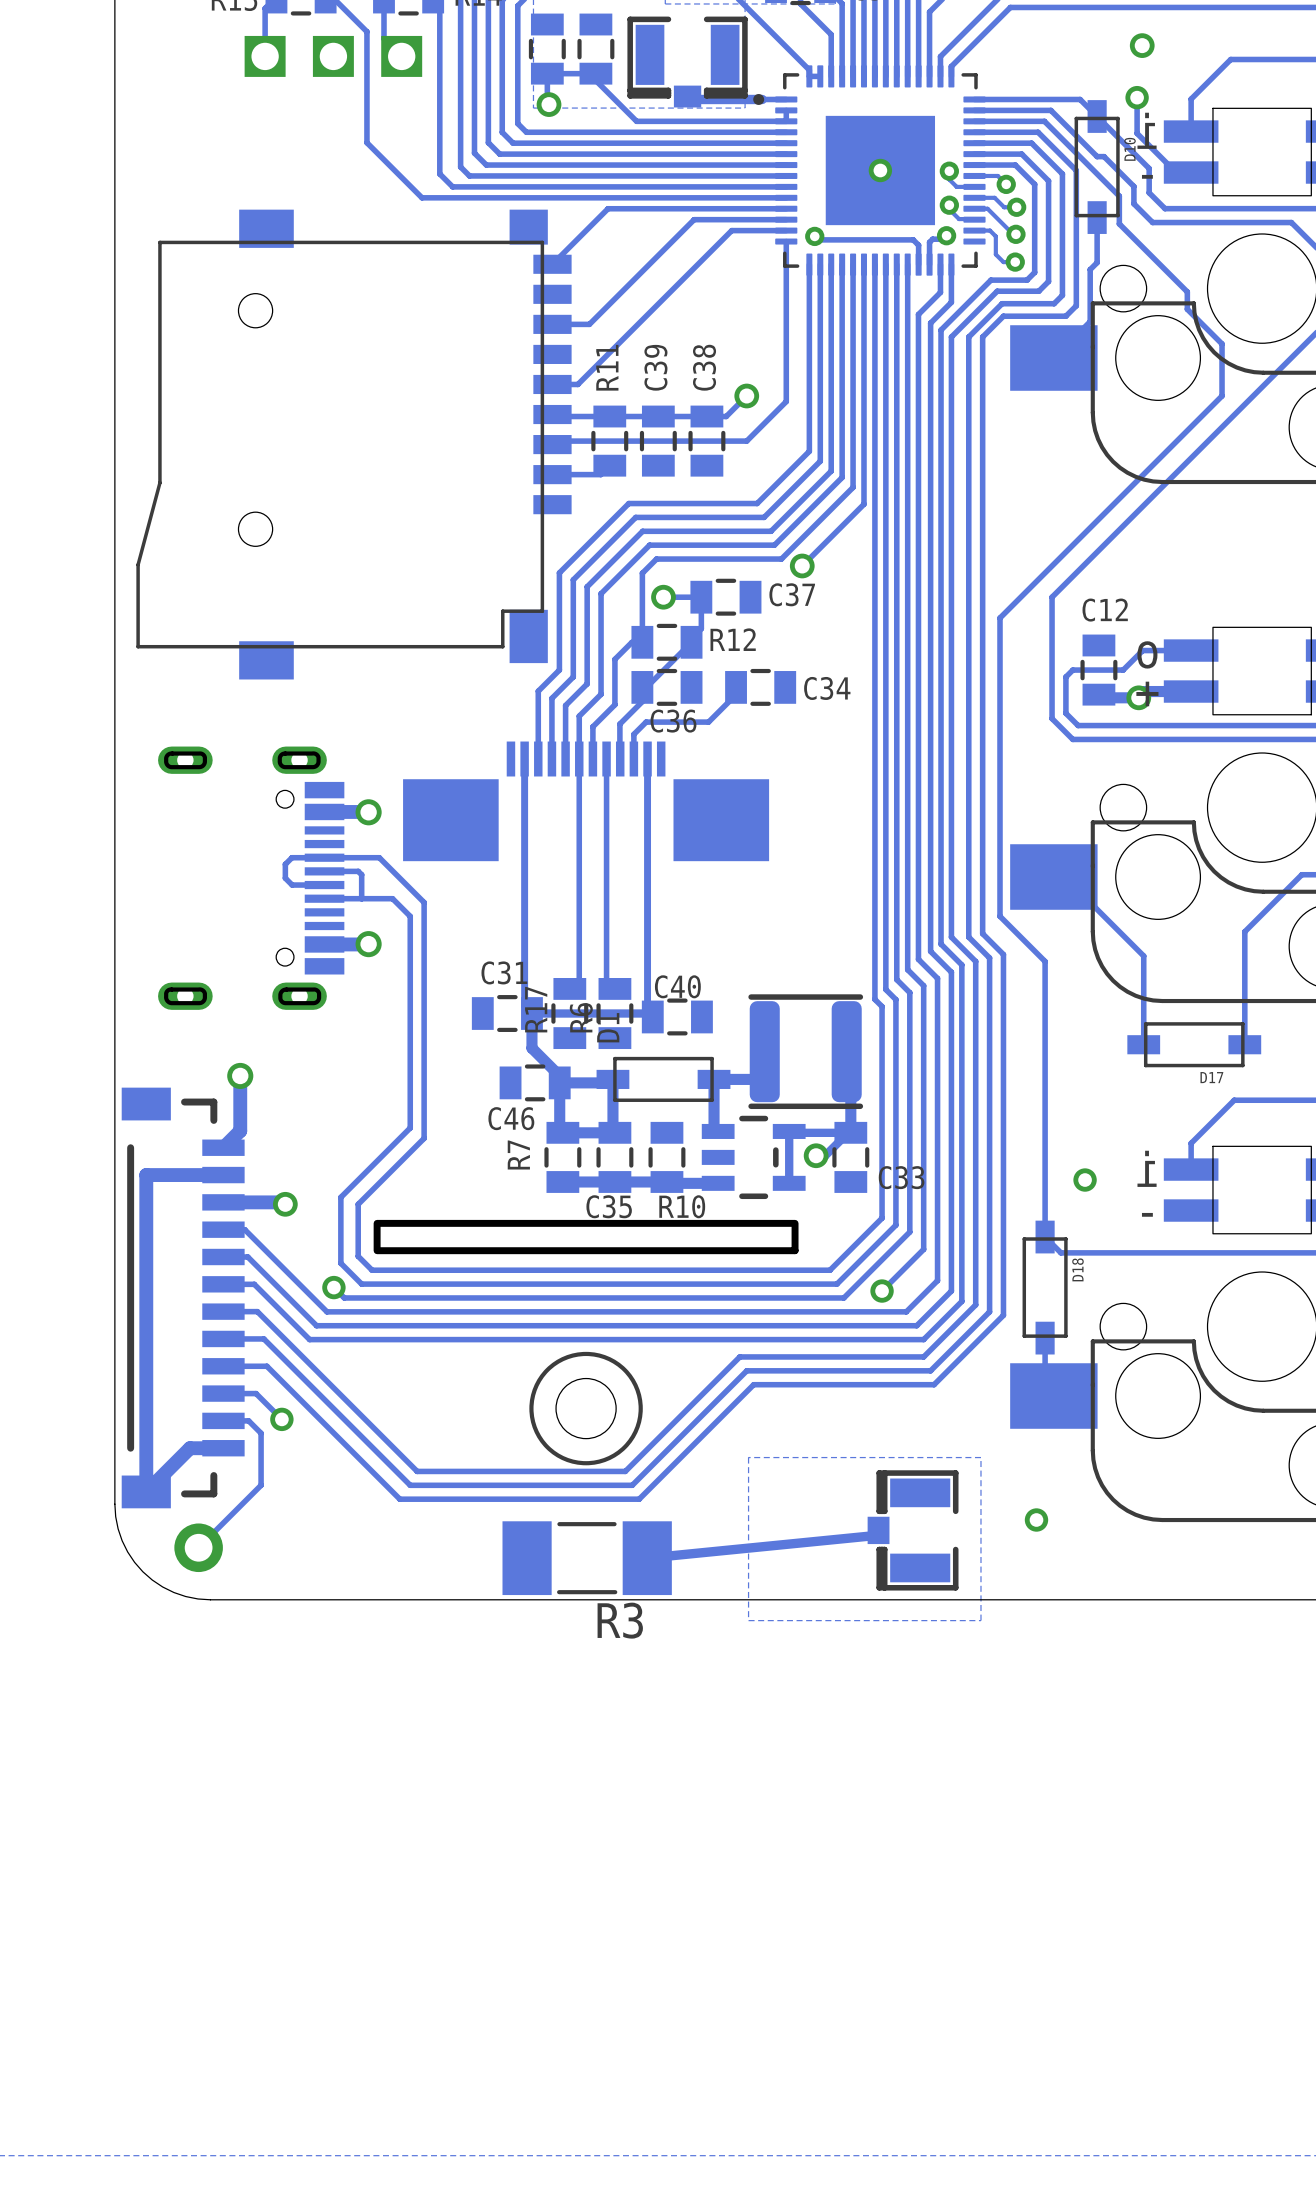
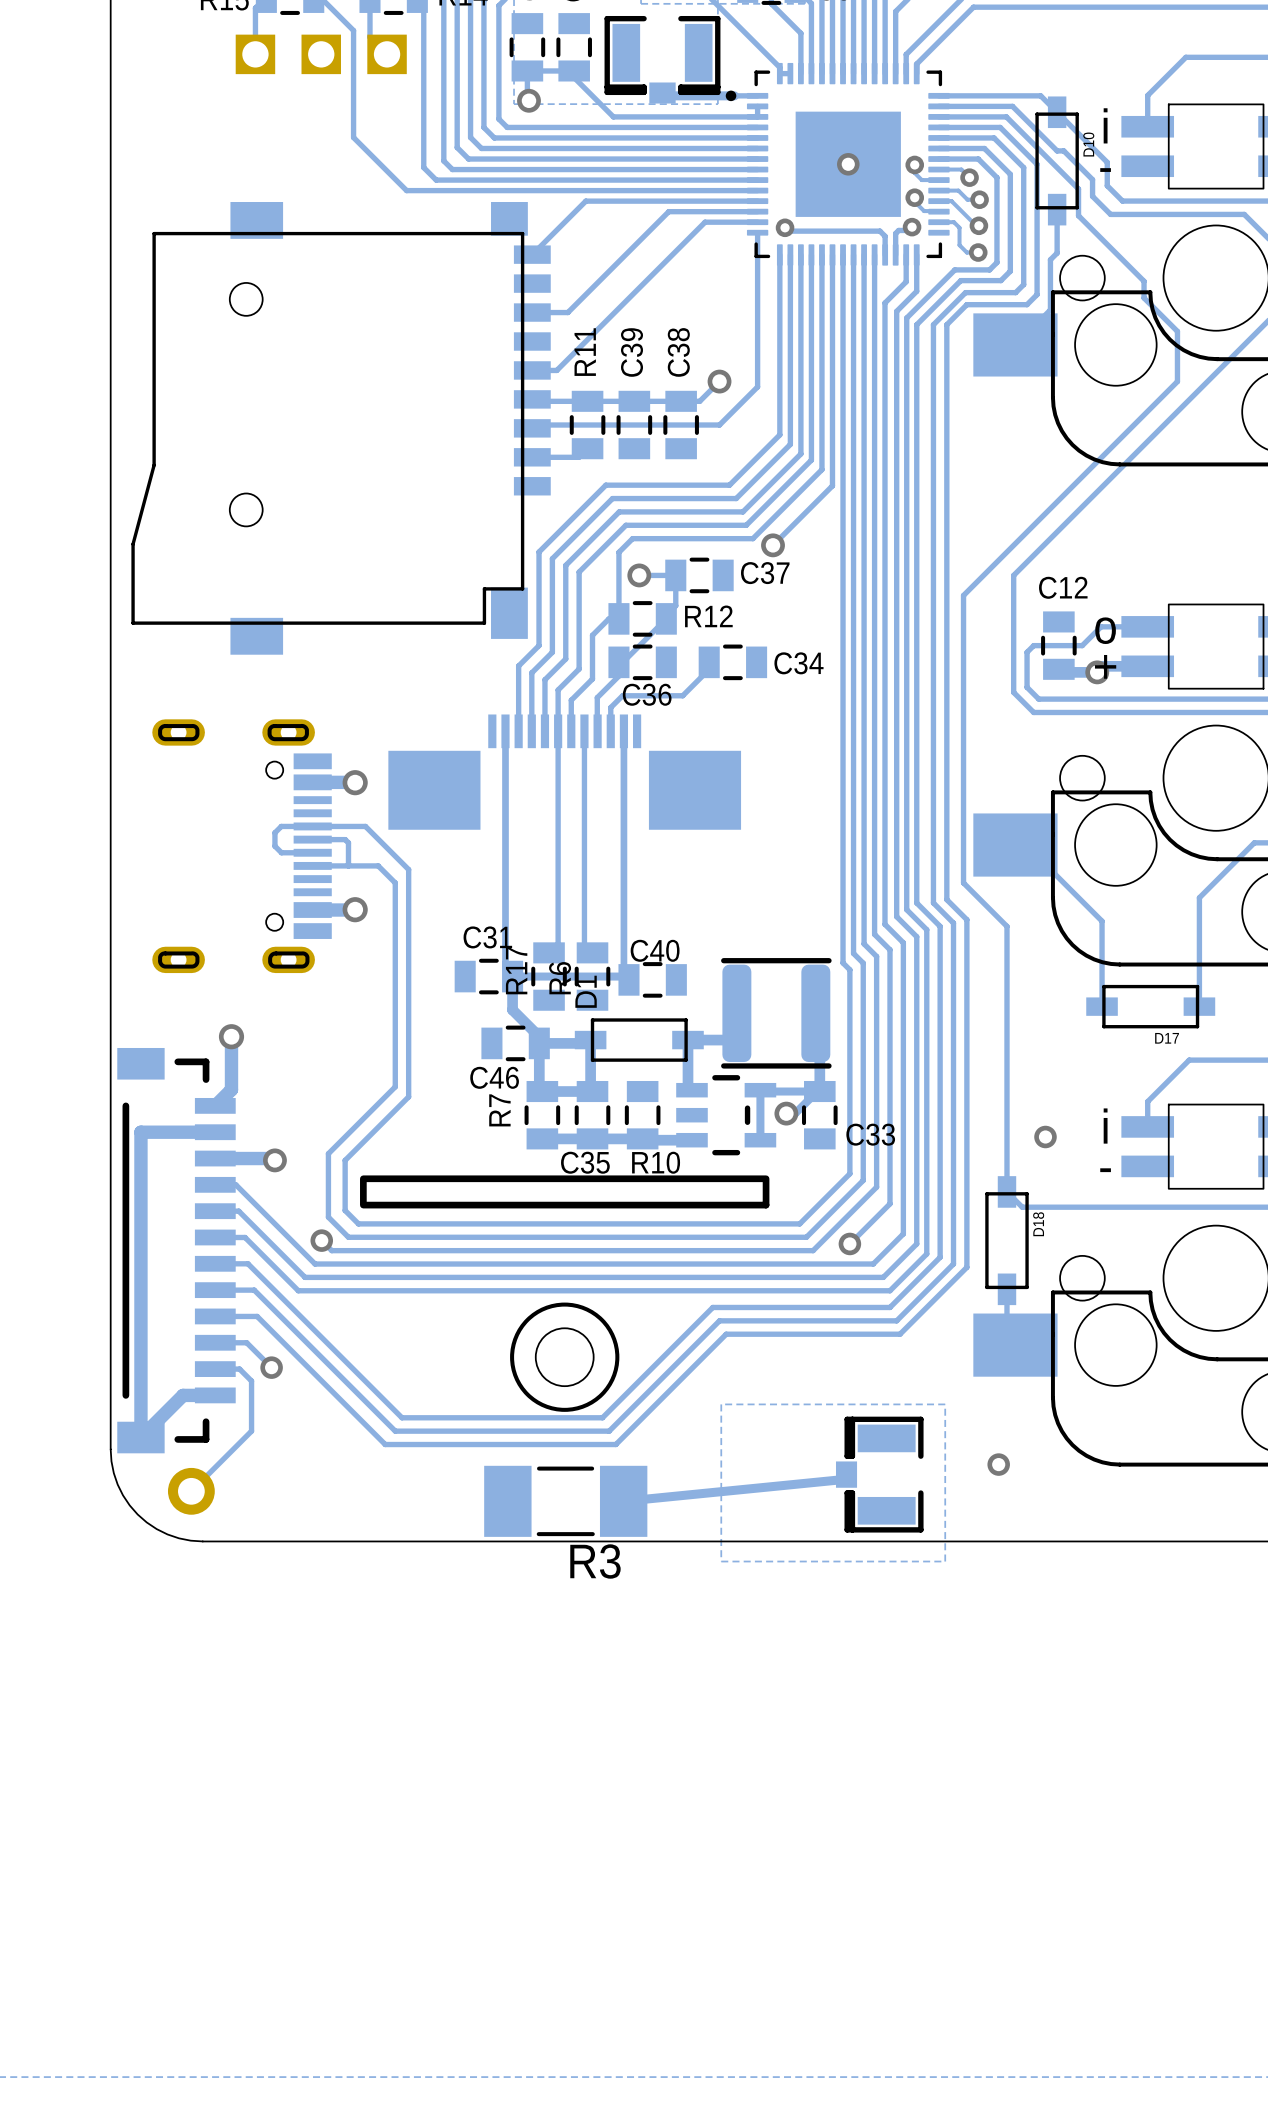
via: (1142, 45) -> none
track: (1137, 97) (1137, 133) (1176, 172) (1191, 172) -> none
via: (1137, 97) -> none

